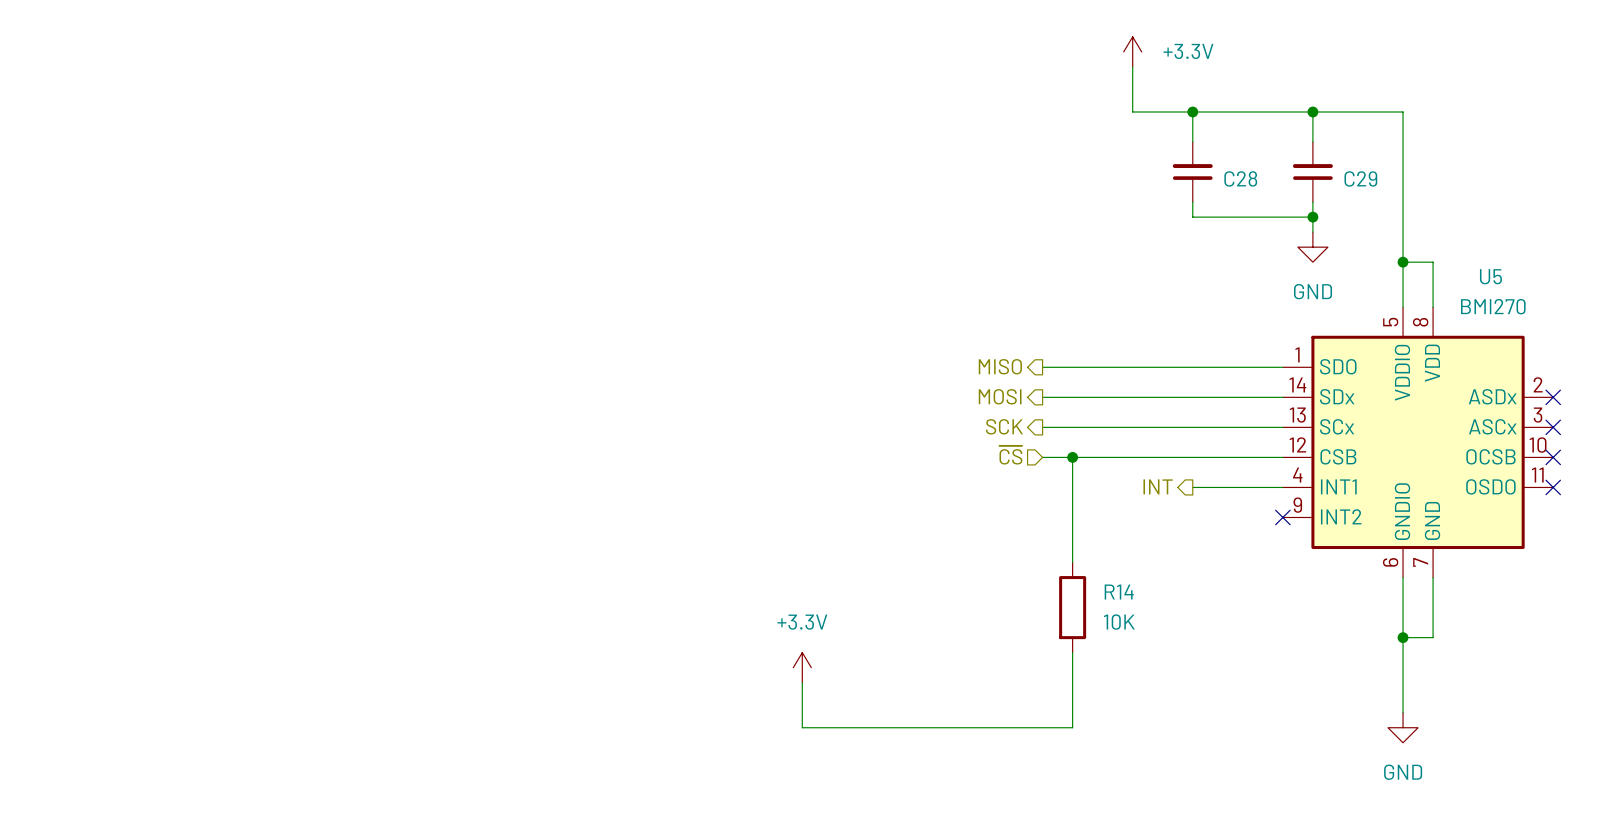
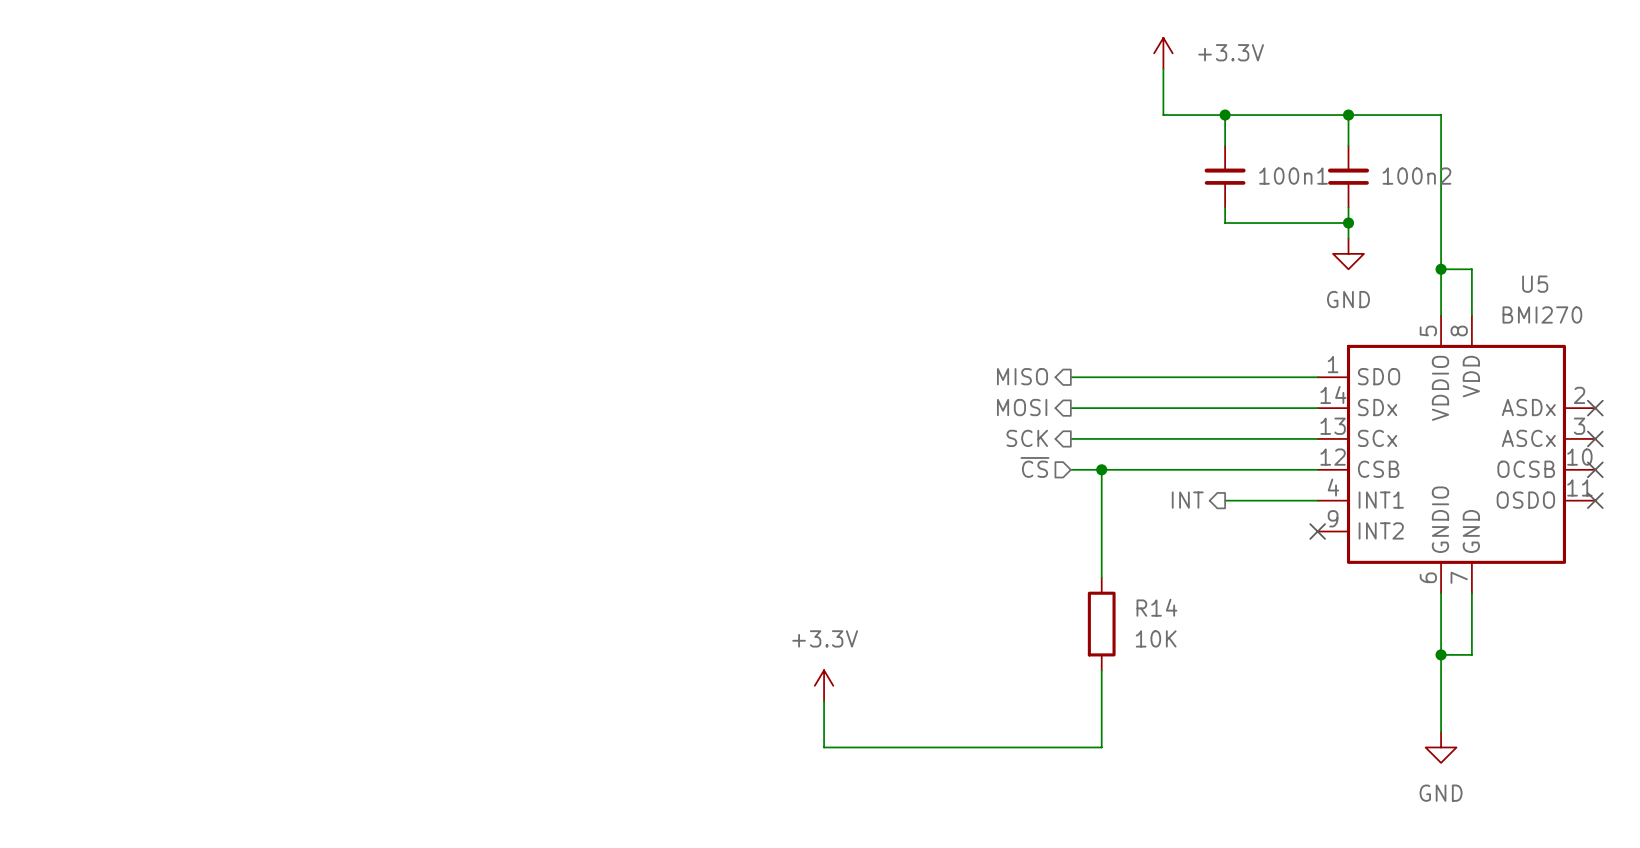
C28 name: C28 (1240, 178) -> 100n1 (1293, 176)
C29 name: C29 (1360, 178) -> 100n2 (1416, 176)

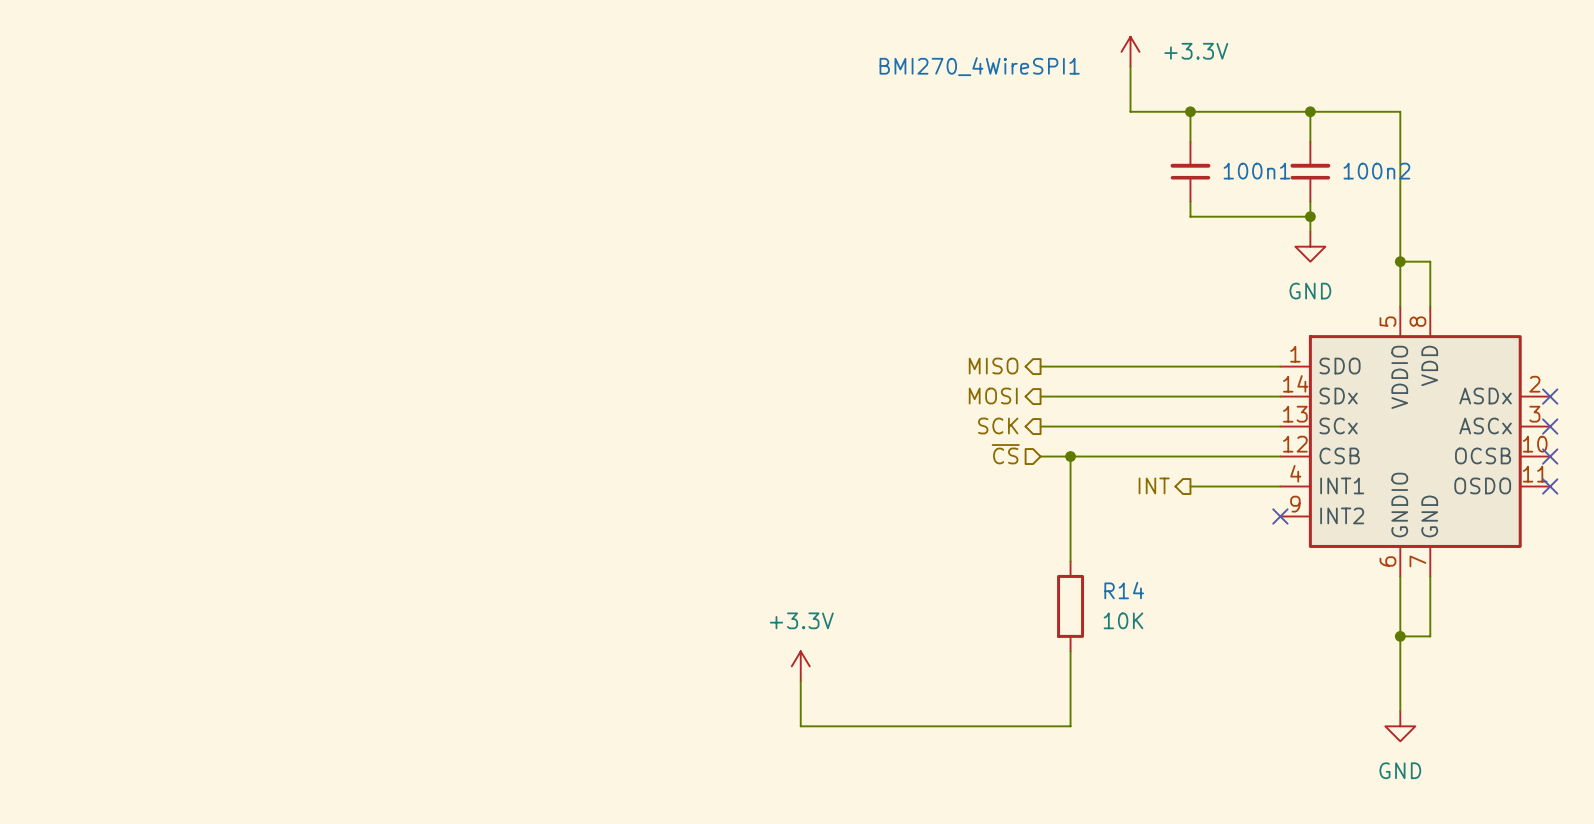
U5 name: U5 (1535, 284) -> BMI270_4WireSPI1 (979, 66)
U5 value: BMI270 (1542, 314) -> none

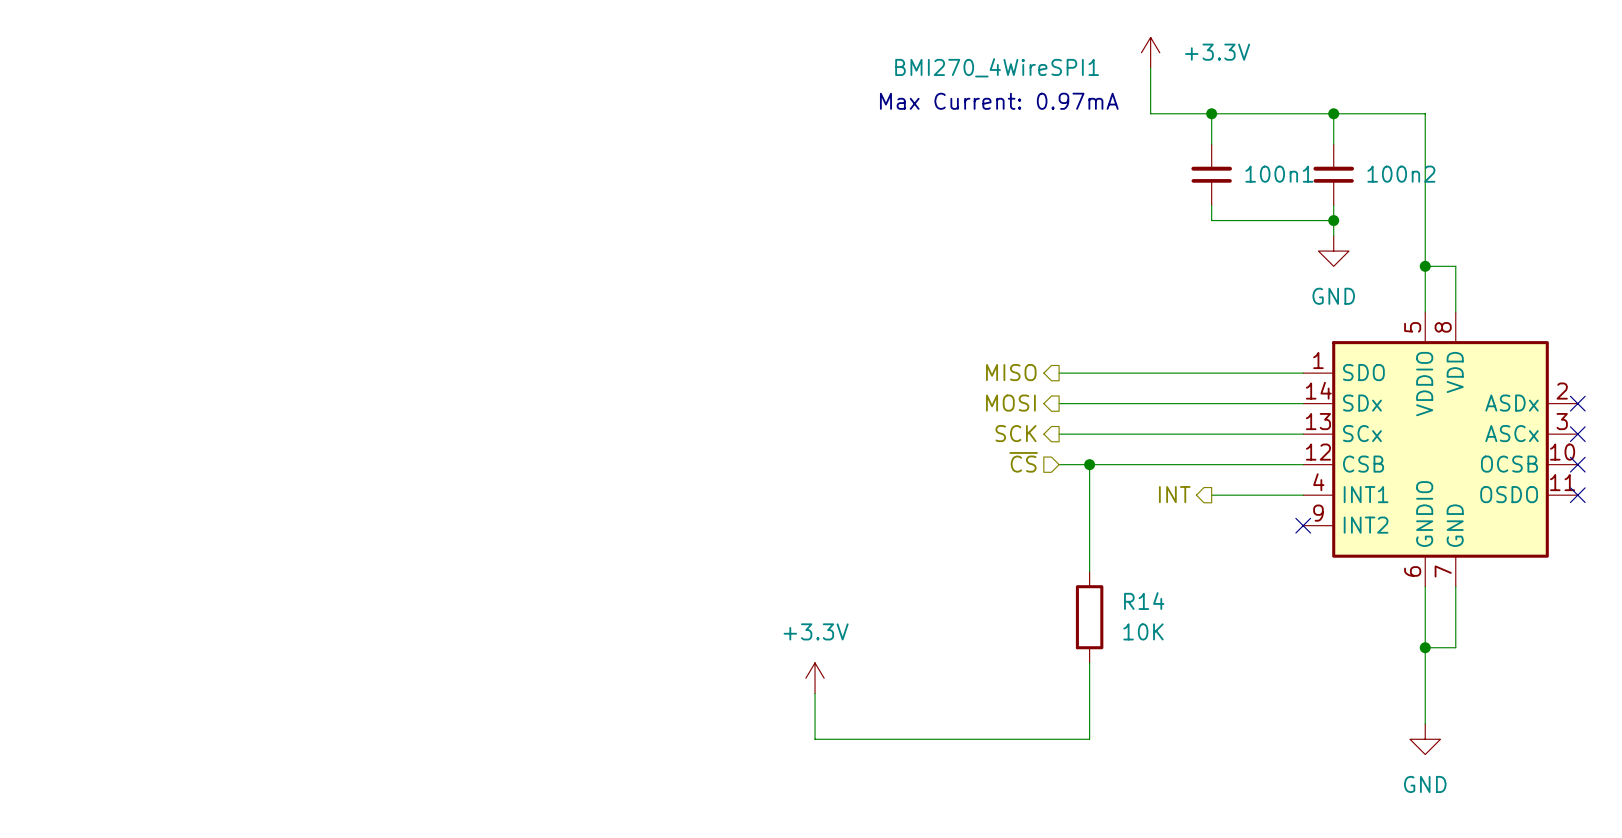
text: none -> Max Current: 0.97mA (999, 101)

